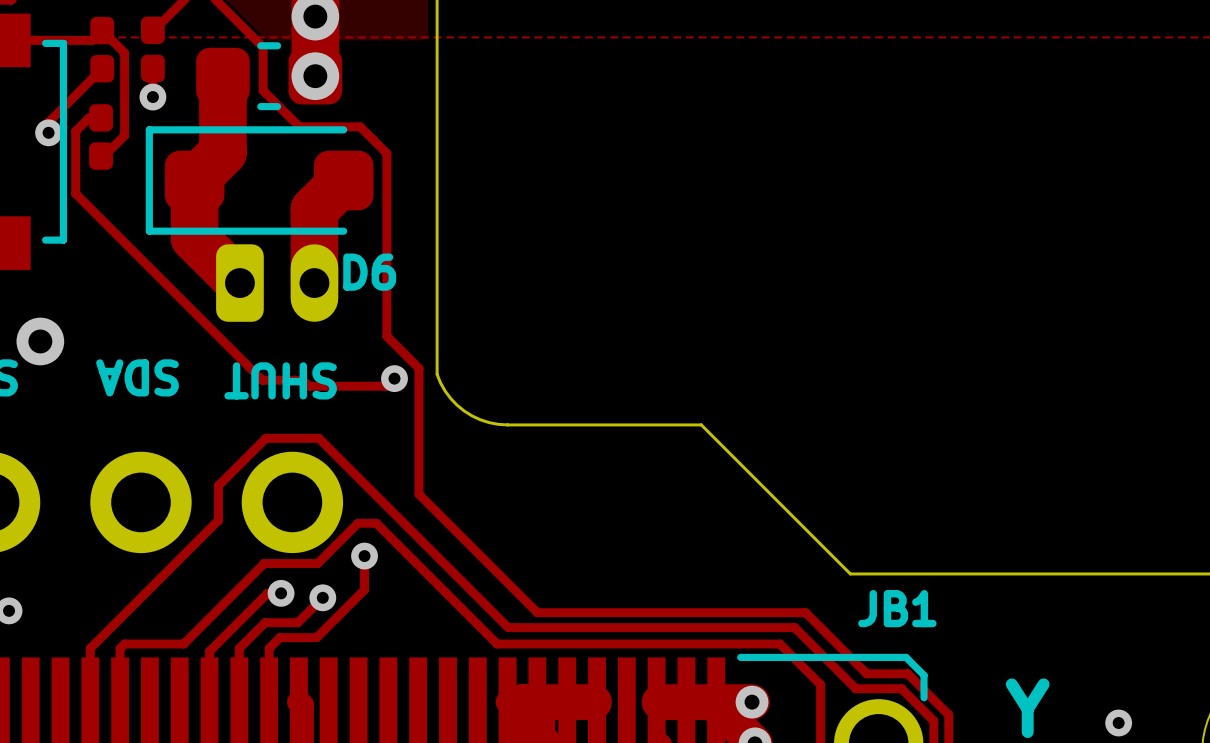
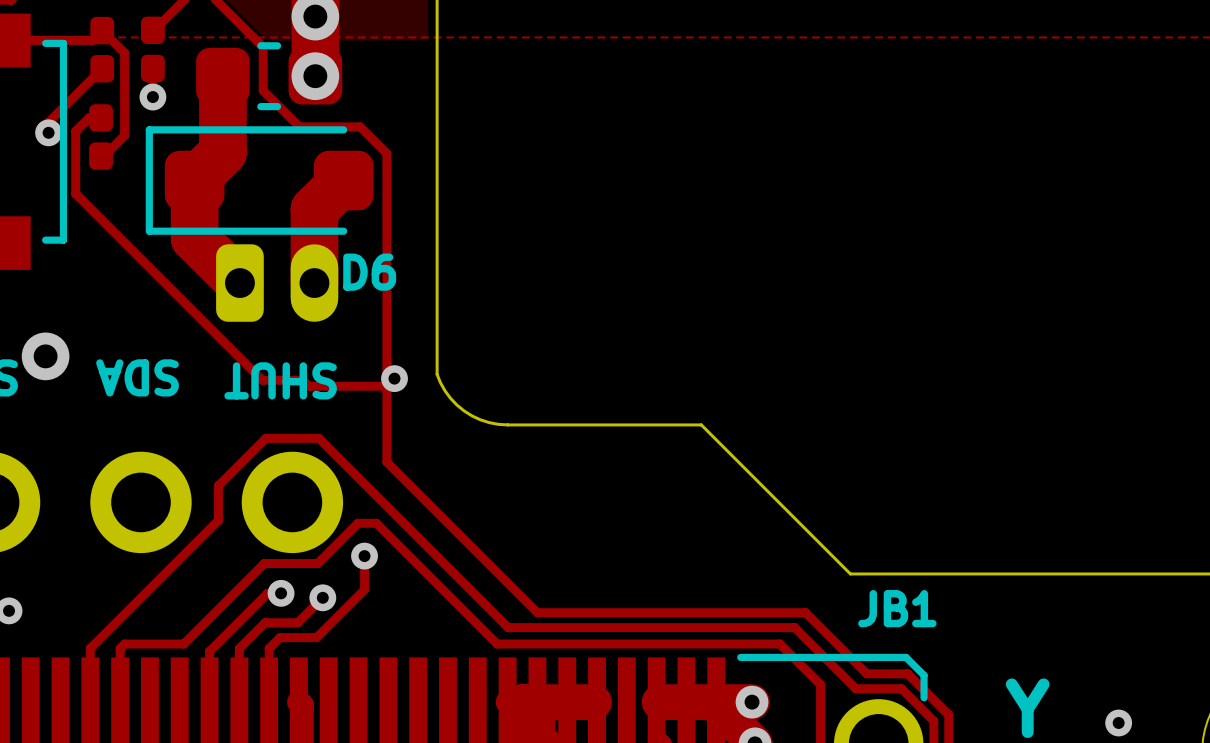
track: (386, 336) (419, 368) (419, 494) -> (386, 336) (386, 462) (419, 494)
via position: (40, 341) -> (45, 356)

